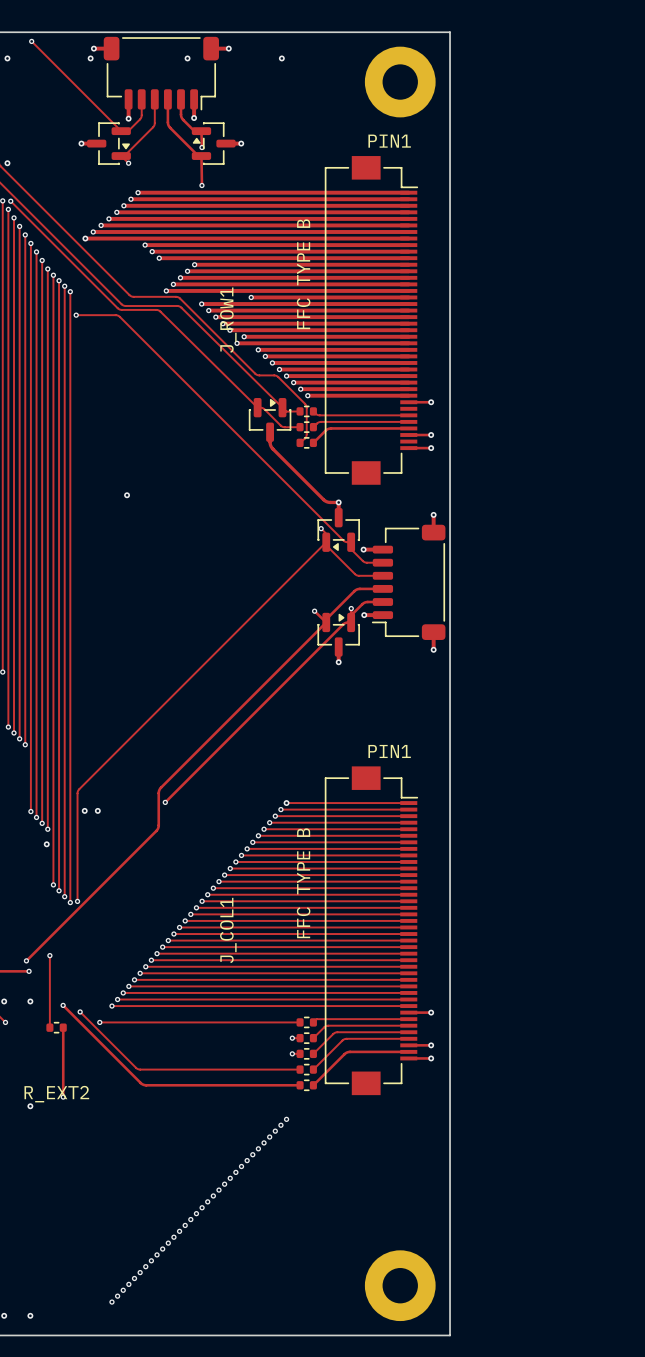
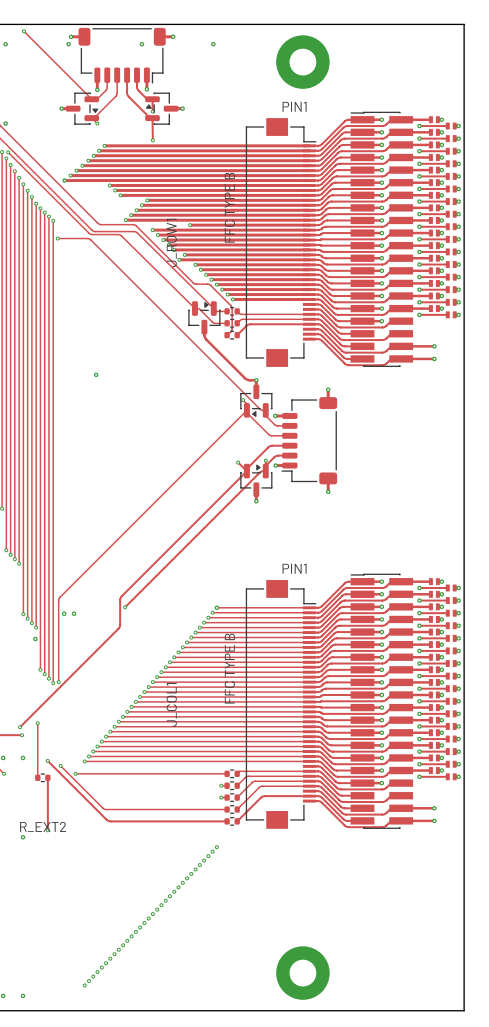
board edge: (450, 32) (450, 1335) -> (340, 24) (464, 24) (464, 1010) (340, 1010)
track: none -> (381, 119) (346, 120) (321, 144) (315, 145)
via: none -> (381, 119)
track: none -> (430, 119) (391, 119) (382, 126) (345, 126) (321, 149) (315, 150)
part: none -> (434, 119)
via: none -> (441, 119)
track: none -> (419, 126) (447, 126)
via: none -> (419, 126)
part: none -> (451, 126)
via: none -> (458, 126)
track: none -> (381, 132) (344, 132) (321, 154) (315, 155)
via: none -> (381, 132)
track: none -> (430, 132) (391, 132) (382, 138) (343, 138) (321, 159) (315, 160)
part: none -> (434, 132)
via: none -> (441, 132)
track: none -> (419, 138) (447, 138)
via: none -> (419, 138)
part: none -> (451, 138)
via: none -> (458, 138)
track: none -> (381, 144) (341, 145) (321, 164) (315, 165)
via: none -> (381, 144)
track: none -> (430, 144) (391, 144) (382, 151) (341, 151) (321, 169) (315, 170)
part: none -> (434, 144)
via: none -> (441, 144)
track: none -> (419, 151) (447, 151)
via: none -> (419, 151)
part: none -> (451, 151)
via: none -> (458, 151)
track: none -> (381, 157) (339, 157) (321, 174) (315, 175)
via: none -> (381, 157)
track: none -> (430, 157) (391, 157) (382, 163) (338, 163) (321, 179) (315, 180)
part: none -> (434, 157)
via: none -> (441, 157)
track: none -> (419, 163) (447, 163)
via: none -> (419, 163)
part: none -> (451, 163)
via: none -> (458, 163)
track: none -> (381, 170) (337, 170) (321, 184) (315, 185)
via: none -> (381, 170)
track: none -> (430, 170) (391, 170) (382, 176) (335, 176) (321, 189) (315, 190)
part: none -> (434, 170)
via: none -> (441, 170)
track: none -> (419, 176) (447, 176)
via: none -> (419, 176)
part: none -> (451, 176)
via: none -> (458, 176)
track: none -> (381, 182) (334, 182) (321, 194) (315, 195)
via: none -> (381, 182)
track: none -> (430, 182) (391, 182) (382, 188) (333, 189) (321, 199) (315, 200)
part: none -> (434, 182)
via: none -> (441, 182)
track: none -> (419, 188) (447, 188)
via: none -> (419, 188)
part: none -> (451, 188)
via: none -> (458, 188)
track: none -> (381, 195) (331, 195) (321, 204) (315, 205)
via: none -> (381, 195)
track: none -> (430, 195) (391, 195) (382, 201) (330, 201) (320, 209) (315, 210)
part: none -> (434, 195)
via: none -> (441, 195)
track: none -> (419, 201) (447, 201)
via: none -> (419, 201)
part: none -> (451, 201)
via: none -> (458, 201)
track: none -> (381, 207) (329, 207) (320, 214) (315, 215)
via: none -> (381, 207)
track: none -> (430, 207) (391, 207) (382, 214) (328, 214) (315, 220)
part: none -> (434, 207)
via: none -> (441, 207)
track: none -> (419, 214) (447, 214)
via: none -> (419, 214)
part: none -> (451, 214)
via: none -> (458, 214)
track: none -> (381, 220) (326, 220) (315, 225)
via: none -> (381, 220)
track: none -> (430, 220) (391, 220) (382, 226) (325, 226) (315, 230)
part: none -> (434, 220)
via: none -> (441, 220)
track: none -> (419, 226) (447, 226)
via: none -> (419, 226)
part: none -> (451, 226)
via: none -> (458, 226)
track: none -> (381, 233) (323, 233) (315, 235)
via: none -> (381, 233)
track: none -> (430, 233) (391, 233) (382, 239) (315, 240)
part: none -> (434, 233)
via: none -> (441, 233)
part: none -> (381, 239)
track: none -> (419, 239) (447, 239)
via: none -> (419, 239)
part: none -> (451, 239)
via: none -> (458, 239)
track: none -> (315, 244) (381, 245)
via: none -> (381, 245)
track: none -> (430, 245) (391, 245) (382, 251) (323, 251) (315, 249)
part: none -> (434, 245)
via: none -> (441, 245)
track: none -> (419, 251) (447, 251)
via: none -> (419, 251)
part: none -> (451, 251)
via: none -> (458, 251)
track: none -> (315, 254) (326, 258) (381, 258)
via: none -> (381, 258)
track: none -> (430, 258) (391, 258) (382, 264) (326, 264) (315, 259)
part: none -> (434, 258)
via: none -> (441, 258)
track: none -> (315, 264) (328, 270) (381, 270)
track: none -> (419, 264) (447, 264)
via: none -> (419, 264)
part: none -> (451, 264)
via: none -> (458, 264)
track: none -> (315, 269) (320, 270) (330, 277) (382, 277) (391, 270) (430, 270)
via: none -> (381, 270)
part: none -> (434, 270)
via: none -> (441, 270)
track: none -> (315, 274) (320, 275) (330, 283) (381, 283)
track: none -> (419, 277) (447, 277)
via: none -> (419, 277)
part: none -> (451, 277)
via: none -> (458, 277)
track: none -> (315, 279) (320, 280) (332, 289) (382, 289) (391, 283) (430, 283)
via: none -> (381, 283)
part: none -> (434, 283)
via: none -> (441, 283)
track: none -> (315, 284) (321, 285) (333, 295) (381, 296)
track: none -> (315, 289) (321, 290) (334, 302) (382, 302) (391, 296) (430, 296)
track: none -> (419, 289) (447, 289)
via: none -> (419, 289)
part: none -> (451, 289)
via: none -> (458, 289)
track: none -> (315, 294) (321, 295) (335, 308) (381, 308)
via: none -> (381, 296)
part: none -> (434, 296)
via: none -> (441, 296)
track: none -> (315, 299) (321, 300) (337, 314) (382, 314) (391, 308) (430, 308)
track: none -> (419, 302) (447, 302)
via: none -> (419, 302)
part: none -> (451, 302)
via: none -> (458, 302)
track: (420, 402) (431, 402) -> (317, 304) (337, 320) (381, 321)
via: (431, 402) -> none
via: none -> (381, 308)
part: none -> (434, 308)
via: none -> (441, 308)
track: none -> (315, 309) (321, 310) (340, 327) (382, 327) (391, 321) (401, 321)
track: none -> (315, 314) (321, 315) (339, 333) (362, 333)
track: none -> (419, 314) (447, 314)
via: none -> (419, 314)
part: none -> (451, 314)
via: none -> (458, 314)
track: none -> (315, 319) (321, 320) (342, 339) (382, 340) (391, 333) (401, 333)
via: none -> (381, 321)
track: none -> (315, 324) (321, 325) (342, 345) (362, 346)
track: (420, 435) (431, 435) -> (317, 329) (345, 352) (382, 352) (391, 346) (434, 346)
via: (431, 435) -> none
track: none -> (315, 334) (321, 335) (344, 358) (362, 358)
track: (420, 448) (431, 448) -> (317, 339) (347, 365) (382, 365) (391, 358) (434, 358)
via: (431, 448) -> none
via: none -> (434, 346)
via: none -> (434, 358)
track: none -> (381, 581) (346, 582) (321, 606) (315, 607)
via: none -> (381, 581)
track: none -> (430, 581) (391, 581) (382, 587) (345, 588) (321, 611) (315, 612)
part: none -> (434, 581)
via: none -> (441, 581)
track: none -> (419, 587) (447, 587)
via: none -> (419, 587)
part: none -> (451, 587)
via: none -> (458, 587)
track: none -> (381, 594) (344, 594) (321, 616) (315, 617)
via: none -> (381, 594)
track: none -> (430, 594) (391, 594) (382, 600) (343, 600) (321, 621) (315, 622)
part: none -> (434, 594)
via: none -> (441, 594)
track: none -> (419, 600) (447, 600)
via: none -> (419, 600)
part: none -> (451, 600)
via: none -> (458, 600)
track: none -> (381, 606) (341, 607) (321, 626) (315, 627)
via: none -> (381, 606)
track: none -> (430, 606) (391, 606) (382, 613) (341, 613) (321, 631) (315, 632)
part: none -> (434, 606)
via: none -> (441, 606)
track: none -> (419, 613) (447, 613)
via: none -> (419, 613)
part: none -> (451, 613)
via: none -> (458, 613)
track: none -> (381, 619) (339, 619) (321, 636) (315, 637)
via: none -> (381, 619)
track: none -> (430, 619) (391, 619) (382, 625) (338, 625) (321, 641) (315, 642)
part: none -> (434, 619)
via: none -> (441, 619)
track: none -> (419, 625) (447, 625)
via: none -> (419, 625)
part: none -> (451, 625)
via: none -> (458, 625)
track: none -> (381, 632) (337, 632) (321, 646) (315, 647)
via: none -> (381, 632)
track: none -> (430, 632) (391, 632) (382, 638) (335, 638) (321, 651) (315, 652)
part: none -> (434, 632)
via: none -> (441, 632)
track: none -> (419, 638) (447, 638)
via: none -> (419, 638)
part: none -> (451, 638)
via: none -> (458, 638)
track: none -> (381, 644) (334, 644) (321, 656) (315, 657)
via: none -> (381, 644)
track: none -> (430, 644) (391, 644) (382, 650) (333, 651) (321, 661) (315, 662)
part: none -> (434, 644)
via: none -> (441, 644)
track: none -> (419, 650) (447, 650)
via: none -> (419, 650)
part: none -> (451, 650)
via: none -> (458, 650)
track: none -> (381, 657) (331, 657) (321, 666) (315, 667)
via: none -> (381, 657)
track: none -> (430, 657) (391, 657) (382, 663) (330, 663) (320, 671) (315, 672)
part: none -> (434, 657)
via: none -> (441, 657)
track: none -> (419, 663) (447, 663)
via: none -> (419, 663)
part: none -> (451, 663)
via: none -> (458, 663)
track: none -> (381, 669) (329, 669) (320, 676) (315, 677)
via: none -> (381, 669)
track: none -> (430, 669) (391, 669) (382, 676) (328, 676) (315, 682)
part: none -> (434, 669)
via: none -> (441, 669)
track: none -> (419, 676) (447, 676)
via: none -> (419, 676)
part: none -> (451, 676)
via: none -> (458, 676)
track: none -> (381, 682) (326, 682) (315, 687)
via: none -> (381, 682)
track: none -> (430, 682) (391, 682) (382, 688) (326, 688) (315, 692)
part: none -> (434, 682)
via: none -> (441, 682)
track: none -> (419, 688) (447, 688)
via: none -> (419, 688)
part: none -> (451, 688)
via: none -> (458, 688)
track: none -> (381, 694) (323, 694) (315, 697)
via: none -> (381, 694)
track: none -> (430, 694) (391, 694) (382, 701) (315, 701)
part: none -> (434, 694)
via: none -> (441, 694)
part: none -> (381, 701)
track: none -> (419, 701) (447, 701)
via: none -> (419, 701)
part: none -> (451, 701)
via: none -> (458, 701)
track: none -> (315, 706) (381, 707)
via: none -> (381, 707)
track: none -> (430, 707) (391, 707) (382, 713) (323, 713) (315, 711)
part: none -> (434, 707)
via: none -> (441, 707)
track: none -> (419, 713) (447, 713)
via: none -> (419, 713)
part: none -> (451, 713)
via: none -> (458, 713)
track: none -> (315, 716) (326, 720) (381, 720)
via: none -> (381, 720)
track: none -> (430, 720) (391, 720) (382, 726) (326, 726) (315, 721)
part: none -> (434, 720)
via: none -> (441, 720)
track: none -> (419, 726) (447, 726)
via: none -> (419, 726)
part: none -> (451, 726)
via: none -> (458, 726)
track: none -> (315, 726) (328, 732) (381, 732)
track: none -> (315, 731) (320, 732) (330, 739) (382, 739) (391, 732) (430, 732)
via: none -> (381, 732)
part: none -> (434, 732)
via: none -> (441, 732)
track: none -> (315, 736) (320, 737) (330, 745) (381, 745)
track: none -> (419, 739) (447, 739)
via: none -> (419, 739)
part: none -> (451, 739)
via: none -> (458, 739)
track: none -> (315, 741) (320, 742) (332, 751) (382, 751) (391, 745) (430, 745)
via: none -> (381, 745)
part: none -> (434, 745)
via: none -> (441, 745)
track: none -> (315, 746) (321, 747) (333, 757) (381, 757)
track: none -> (315, 751) (321, 752) (334, 764) (382, 764) (391, 757) (430, 757)
track: none -> (419, 751) (447, 751)
via: none -> (419, 751)
part: none -> (451, 751)
via: none -> (458, 751)
track: none -> (315, 756) (321, 757) (335, 770) (381, 770)
via: none -> (381, 757)
part: none -> (434, 757)
via: none -> (441, 757)
track: none -> (315, 761) (321, 762) (337, 776) (382, 776) (391, 770) (430, 770)
track: none -> (419, 764) (447, 764)
via: none -> (419, 764)
part: none -> (451, 764)
via: none -> (458, 764)
track: (420, 1012) (431, 1012) -> (317, 766) (337, 782) (381, 783)
via: (431, 1012) -> none
via: none -> (381, 770)
part: none -> (434, 770)
via: none -> (441, 770)
track: none -> (315, 771) (321, 772) (340, 789) (382, 789) (391, 783) (401, 783)
track: none -> (315, 776) (321, 777) (339, 795) (362, 795)
track: none -> (419, 776) (447, 776)
via: none -> (419, 776)
part: none -> (451, 776)
via: none -> (458, 776)
track: none -> (315, 781) (321, 782) (342, 801) (382, 801) (391, 795) (401, 795)
via: none -> (381, 783)
track: none -> (315, 786) (321, 787) (342, 807) (362, 808)
track: (420, 1045) (431, 1045) -> (317, 791) (345, 814) (382, 814) (391, 808) (434, 808)
via: (431, 1045) -> none
track: none -> (315, 796) (321, 797) (344, 820) (362, 820)
track: (420, 1058) (431, 1058) -> (317, 801) (347, 827) (382, 827) (391, 820) (434, 820)
via: (431, 1058) -> none
via: none -> (434, 808)
via: none -> (434, 820)

